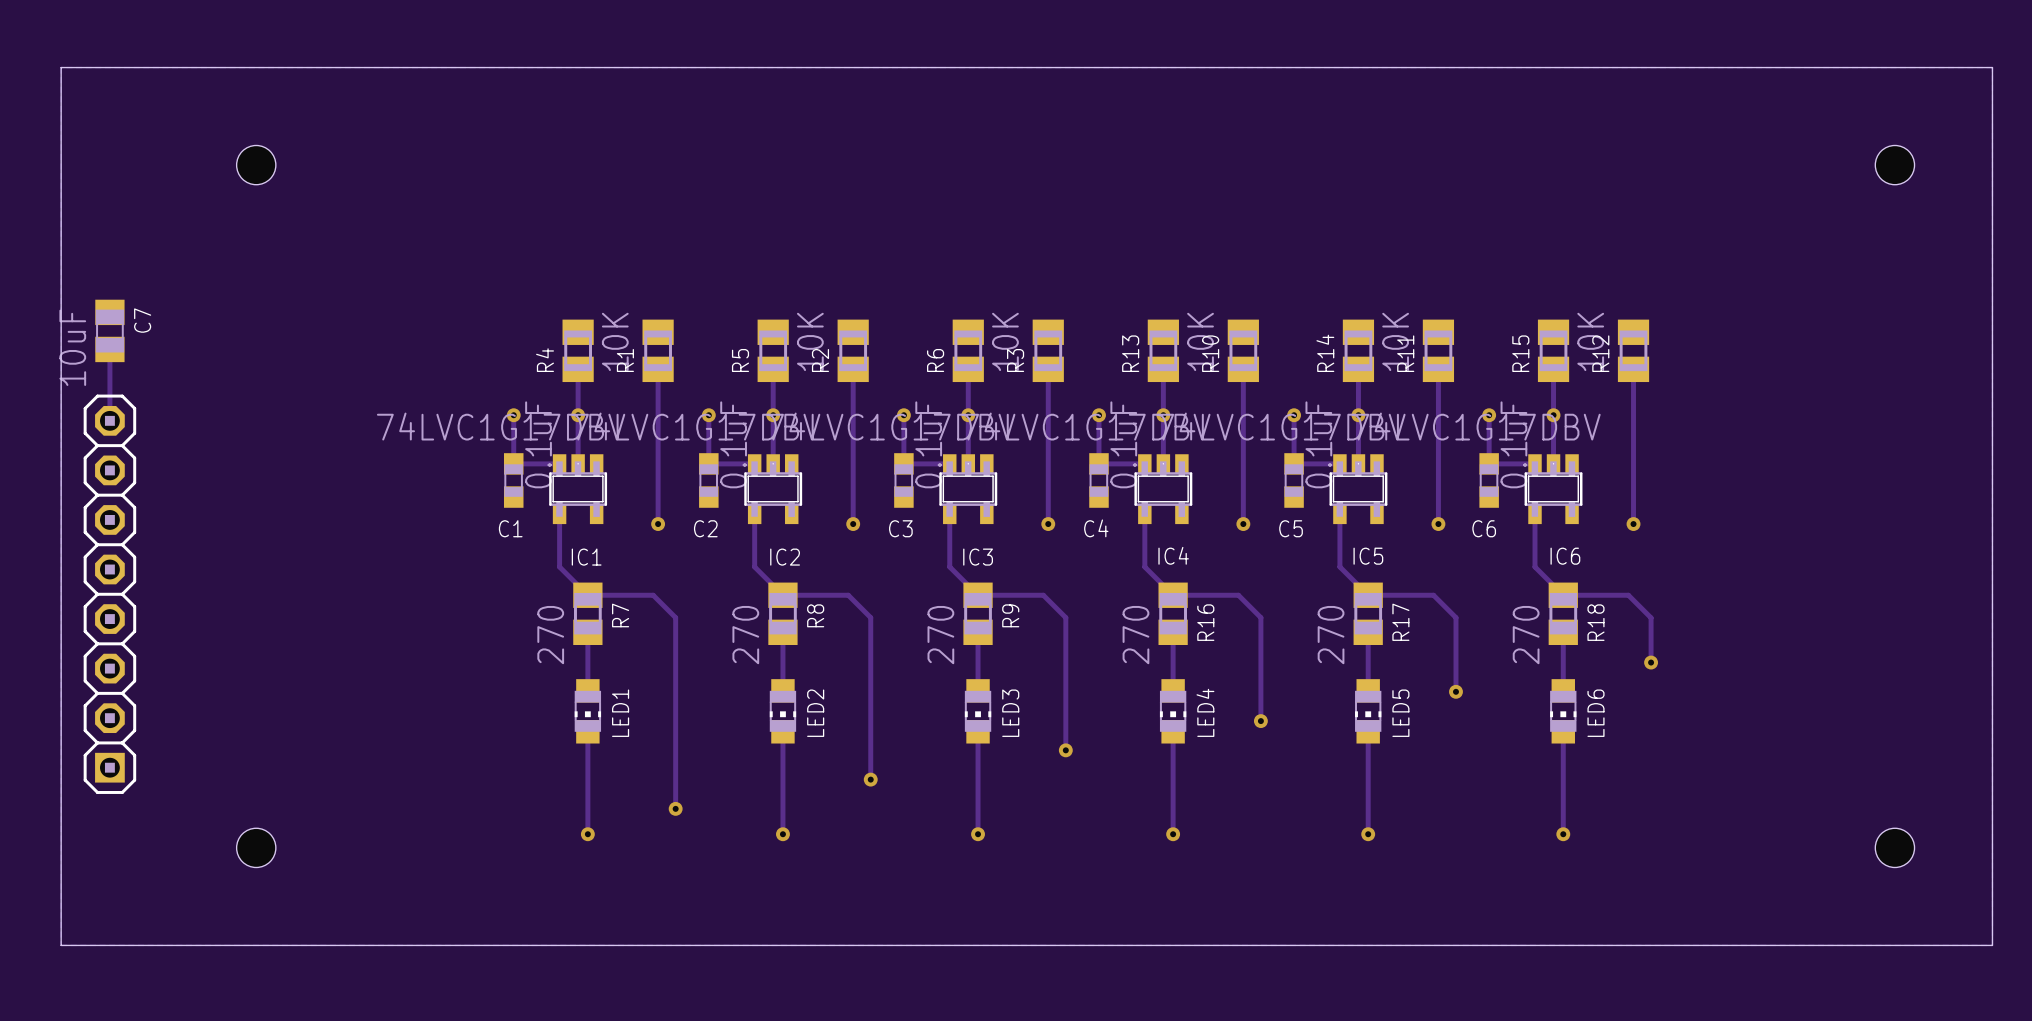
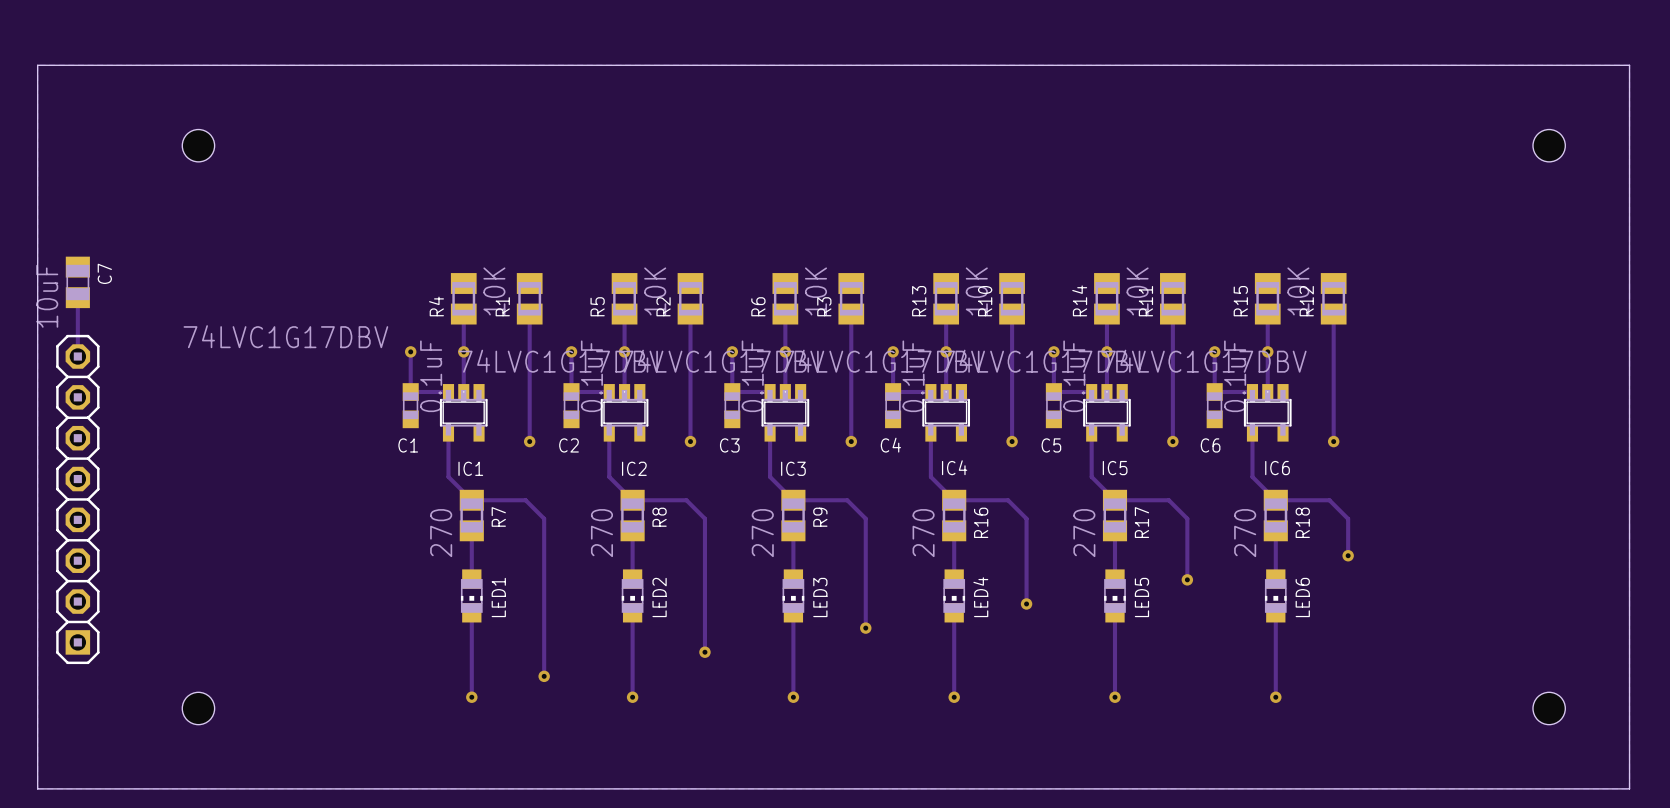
IC1 value position: 74LVC1G17DBV (501, 426) -> 74LVC1G17DBV (285, 336)

